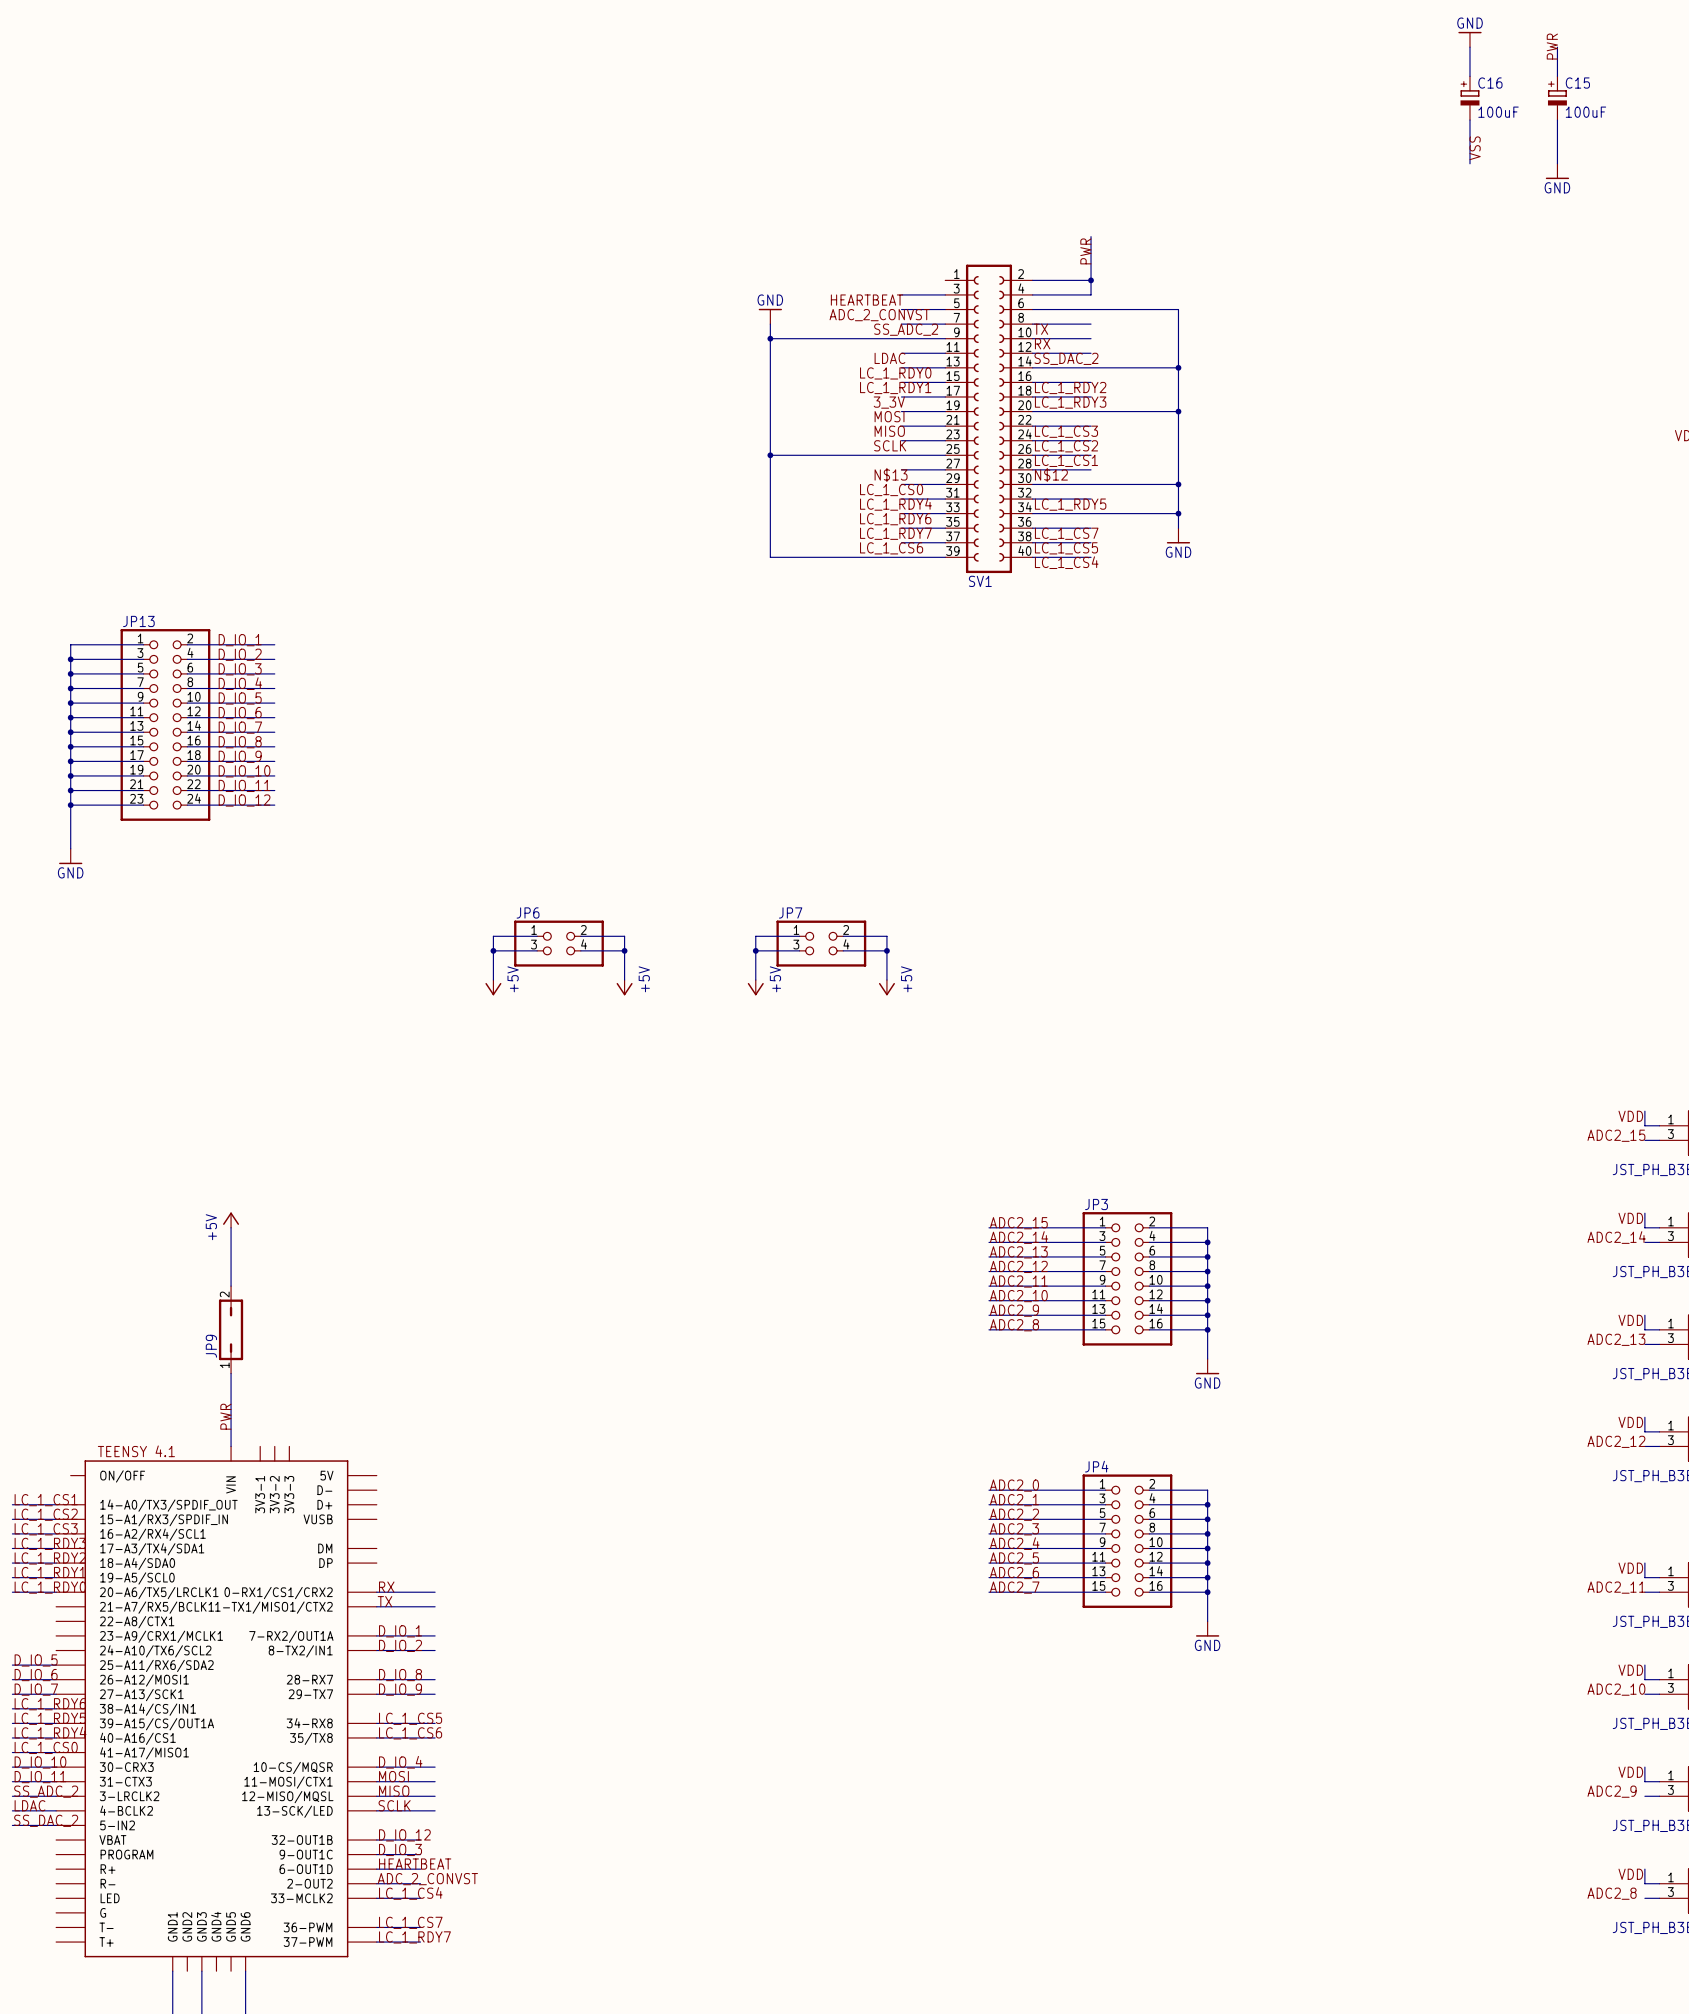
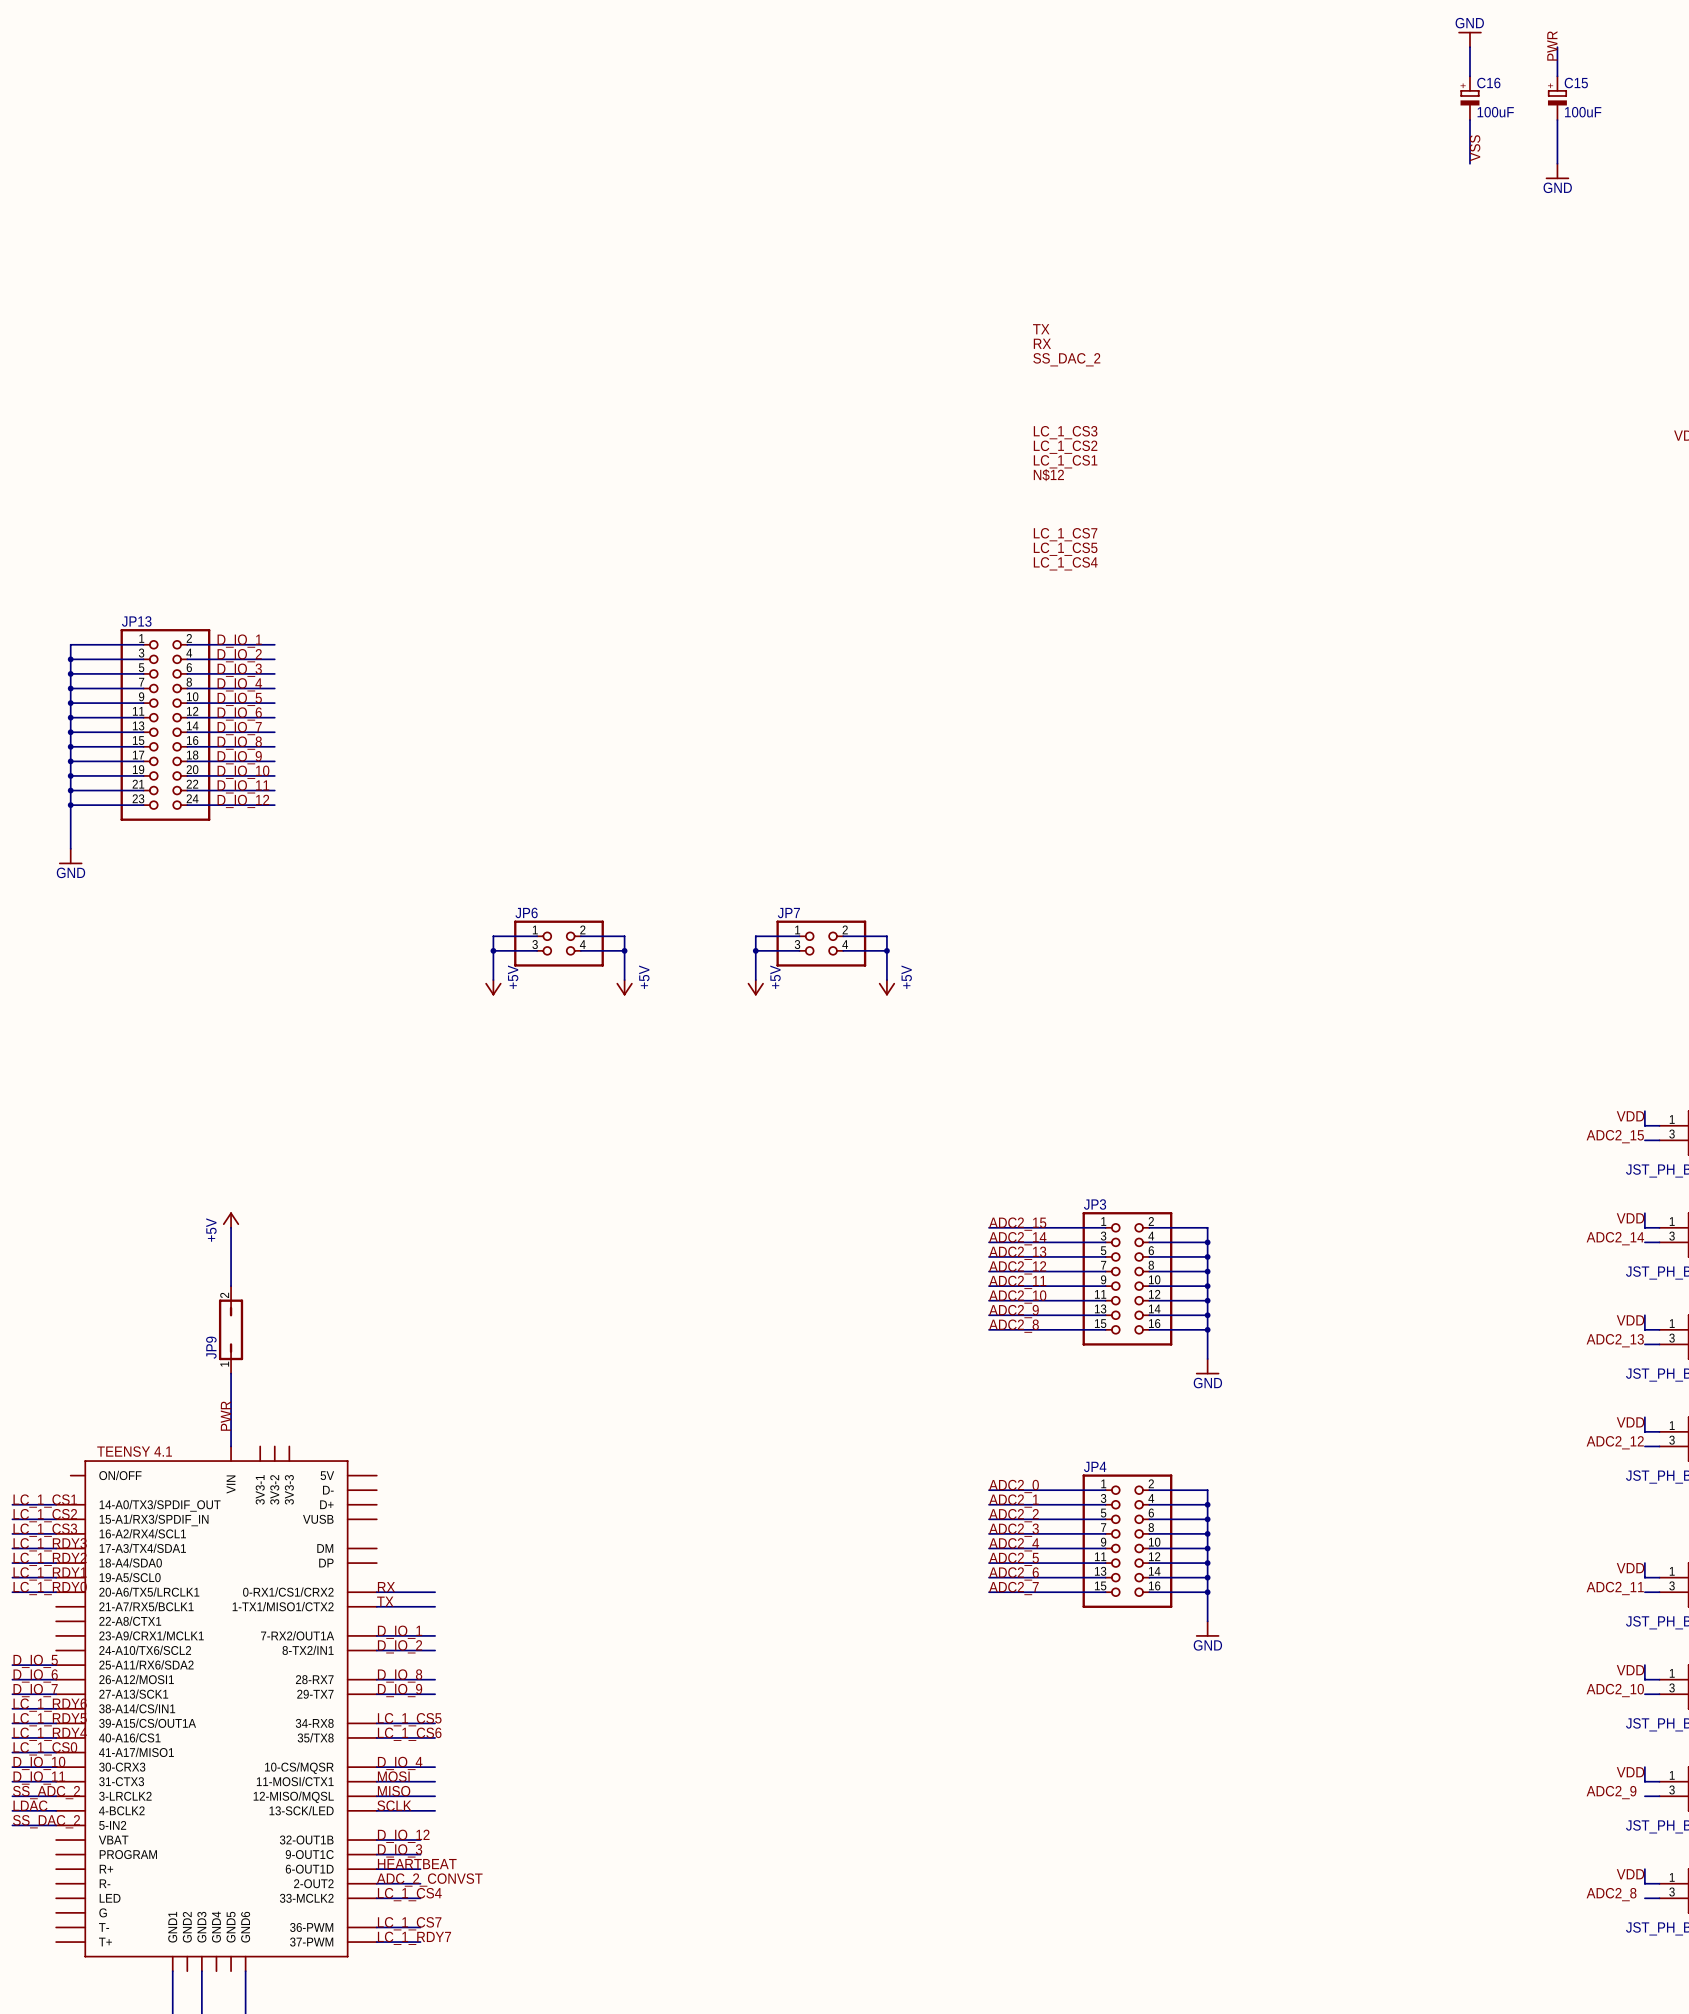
wire: (1091, 236) (1091, 294) (1032, 294) -> none
label: PWR (1085, 251) -> none
wire: (1032, 280) (1091, 280) -> none
junction: (1091, 280) -> none
wire: (901, 294) (945, 294) -> none
label: HEARTBEAT (867, 300) -> none
wire: (901, 309) (945, 309) -> none
wire: (1032, 309) (1178, 309) (1178, 528) -> none
label: ADC_2_CONVST (879, 315) -> none
power symbol: GND (770, 316) -> none
wire: (770, 324) (770, 557) (945, 557) -> none
wire: (901, 324) (945, 324) -> none
wire: (1032, 324) (1091, 324) -> none
label: SS_ADC_2 (906, 329) -> none
wire: (770, 338) (945, 338) -> none
junction: (770, 338) -> none
wire: (1032, 338) (1091, 338) -> none
wire: (901, 353) (945, 353) -> none
wire: (1032, 353) (1091, 353) -> none
label: LDAC (889, 358) -> none
wire: (901, 367) (945, 367) -> none
wire: (1032, 367) (1178, 367) -> none
junction: (1178, 367) -> none
label: LC_1_RDY0 (895, 373) -> none
wire: (901, 382) (945, 382) -> none
wire: (1032, 382) (1091, 382) -> none
label: LC_1_RDY1 (895, 388) -> none
label: LC_1_RDY2 (1070, 388) -> none
wire: (901, 396) (945, 396) -> none
wire: (1032, 396) (1091, 396) -> none
label: 3_3V (889, 402) -> none
label: LC_1_RDY3 (1070, 402) -> none
wire: (901, 411) (945, 411) -> none
wire: (1032, 411) (1178, 411) -> none
junction: (1178, 411) -> none
label: MOSI (889, 416) -> none
SV1: (988, 418) -> none
wire: (901, 426) (945, 426) -> none
wire: (1032, 426) (1091, 426) -> none
label: MISO (889, 431) -> none
wire: (901, 440) (945, 440) -> none
wire: (1032, 440) (1091, 440) -> none
label: SCLK (890, 445) -> none
wire: (770, 455) (945, 455) -> none
junction: (770, 455) -> none
wire: (1032, 455) (1091, 455) -> none
wire: (901, 469) (945, 469) -> none
wire: (1032, 469) (1091, 469) -> none
label: N$13 (891, 474) -> none
wire: (901, 484) (945, 484) -> none
wire: (1032, 484) (1178, 484) -> none
junction: (1178, 484) -> none
label: LC_1_CS0 (891, 490) -> none
wire: (901, 499) (945, 499) -> none
wire: (1032, 499) (1091, 499) -> none
label: LC_1_RDY4 (895, 504) -> none
label: LC_1_RDY5 (1070, 504) -> none
wire: (901, 513) (945, 513) -> none
wire: (1032, 513) (1178, 513) -> none
junction: (1178, 513) -> none
label: LC_1_RDY6 (895, 519) -> none
wire: (901, 528) (945, 528) -> none
wire: (1032, 528) (1091, 528) -> none
label: LC_1_RDY7 (895, 533) -> none
power symbol: GND (1178, 535) -> none
wire: (901, 542) (945, 542) -> none
wire: (1032, 542) (1091, 542) -> none
label: LC_1_CS6 (891, 548) -> none
wire: (1032, 557) (1091, 557) -> none

